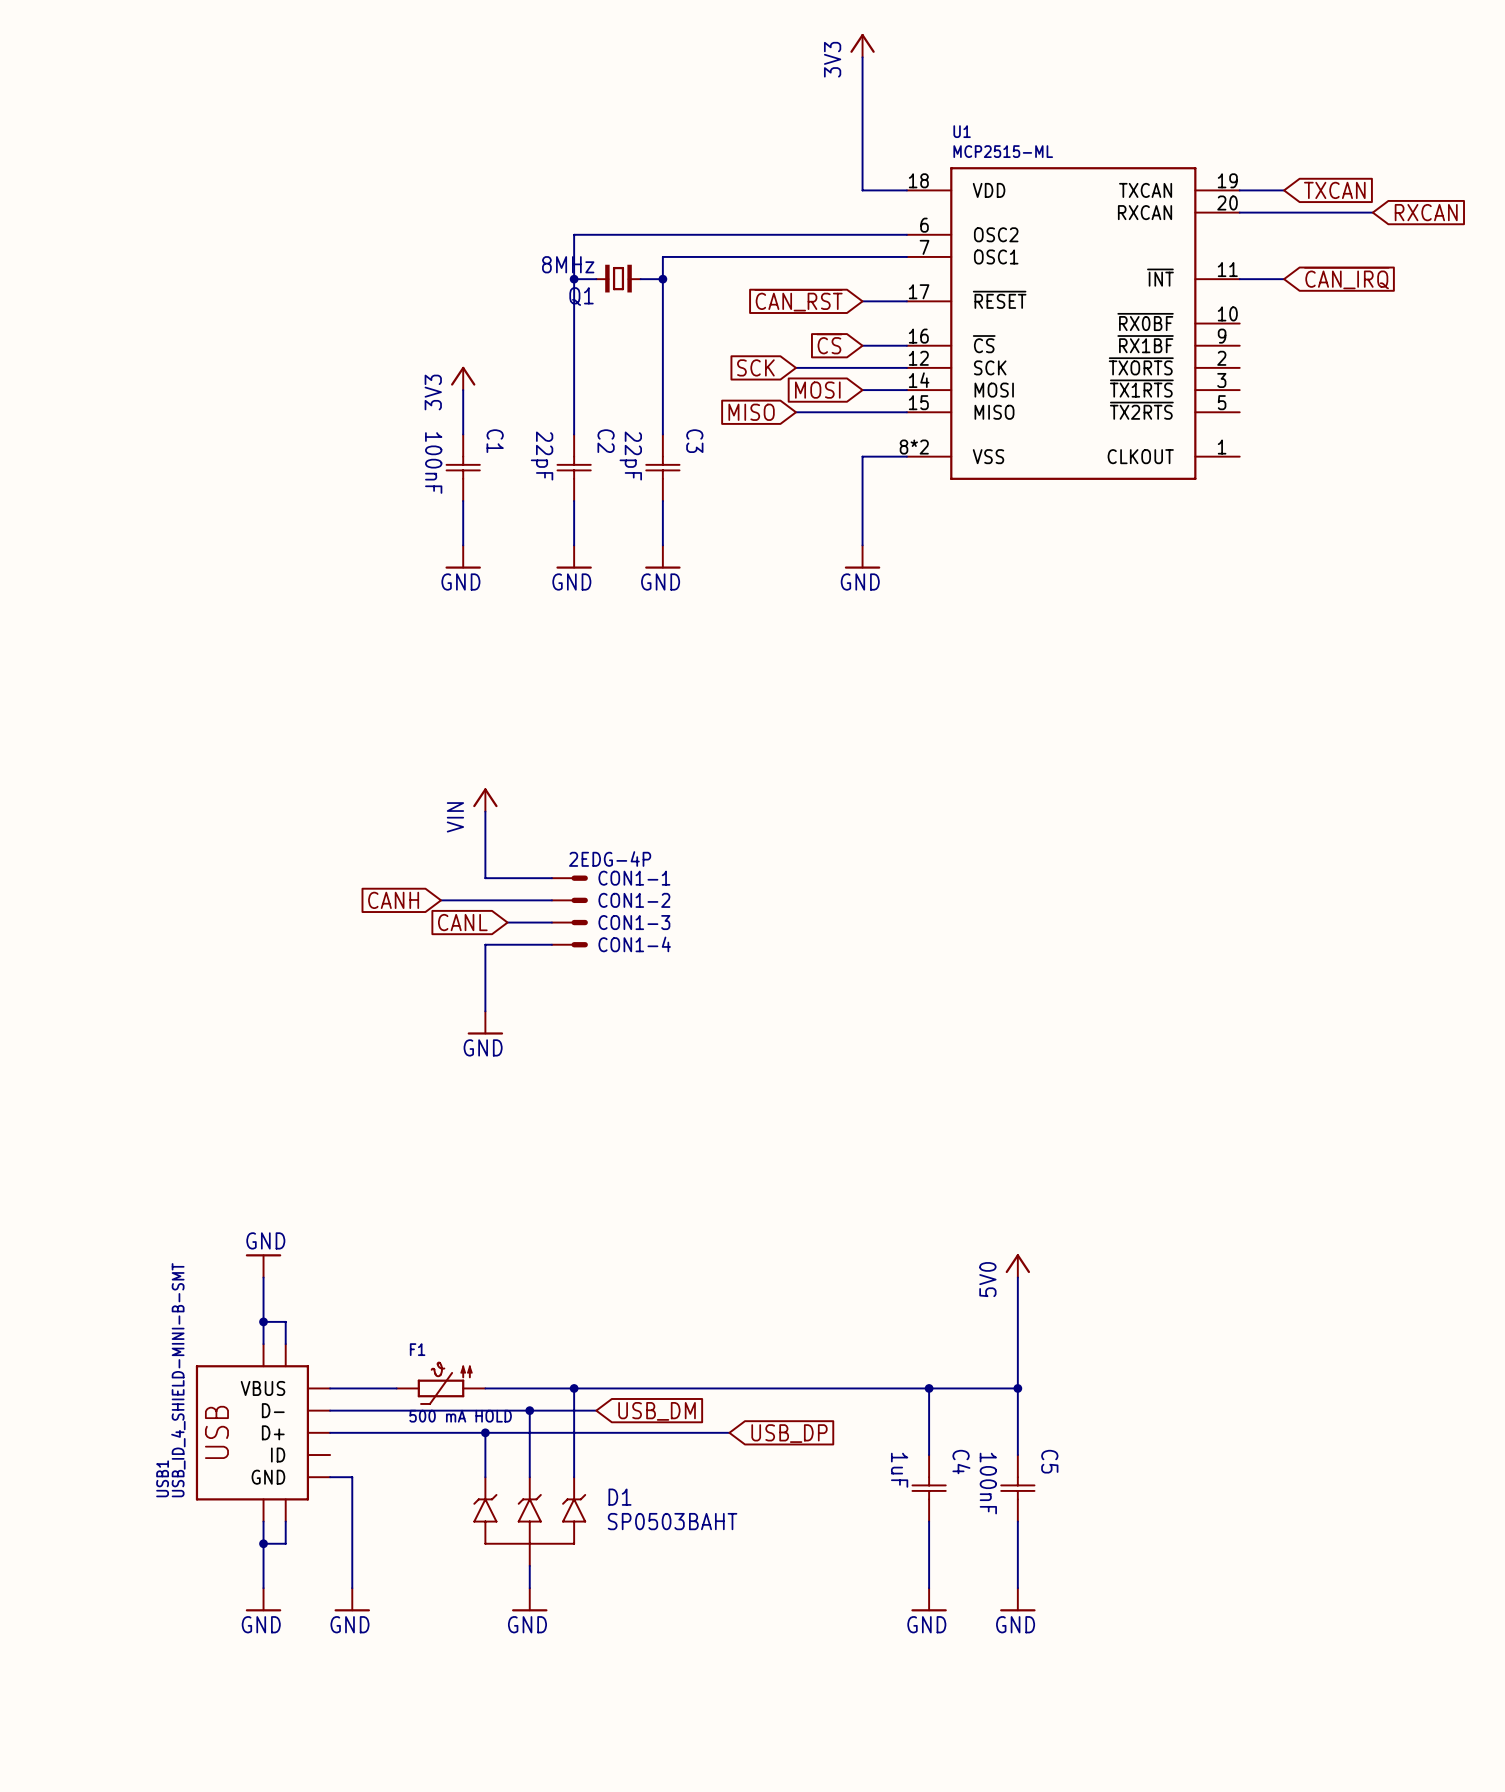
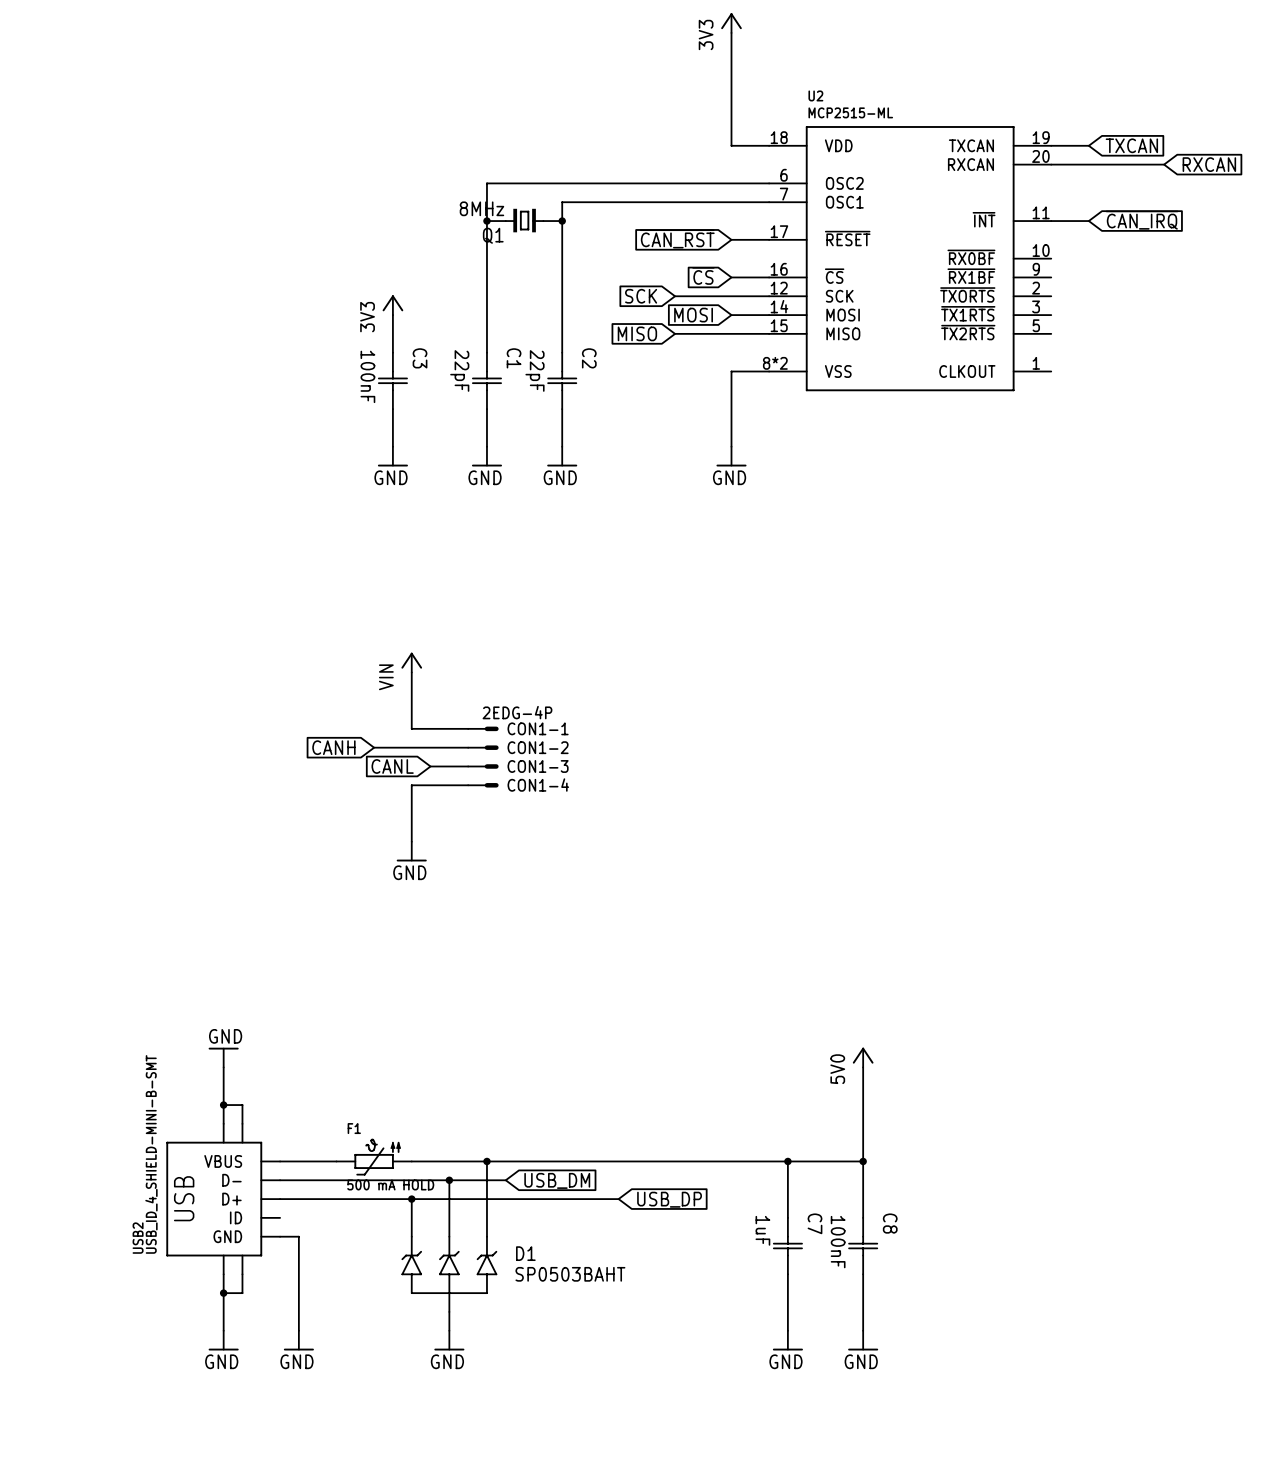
U1 name: U1 (962, 131) -> U2 (815, 95)
C1 name: C1 (495, 441) -> C3 (420, 358)
C2 name: C2 (606, 441) -> C1 (514, 358)
C3 name: C3 (694, 441) -> C2 (589, 358)
C5 name: C5 (1049, 1461) -> C8 (890, 1223)
C4 name: C4 (961, 1462) -> C7 (815, 1223)
USB1 name: USB1 (162, 1478) -> USB2 (138, 1238)

